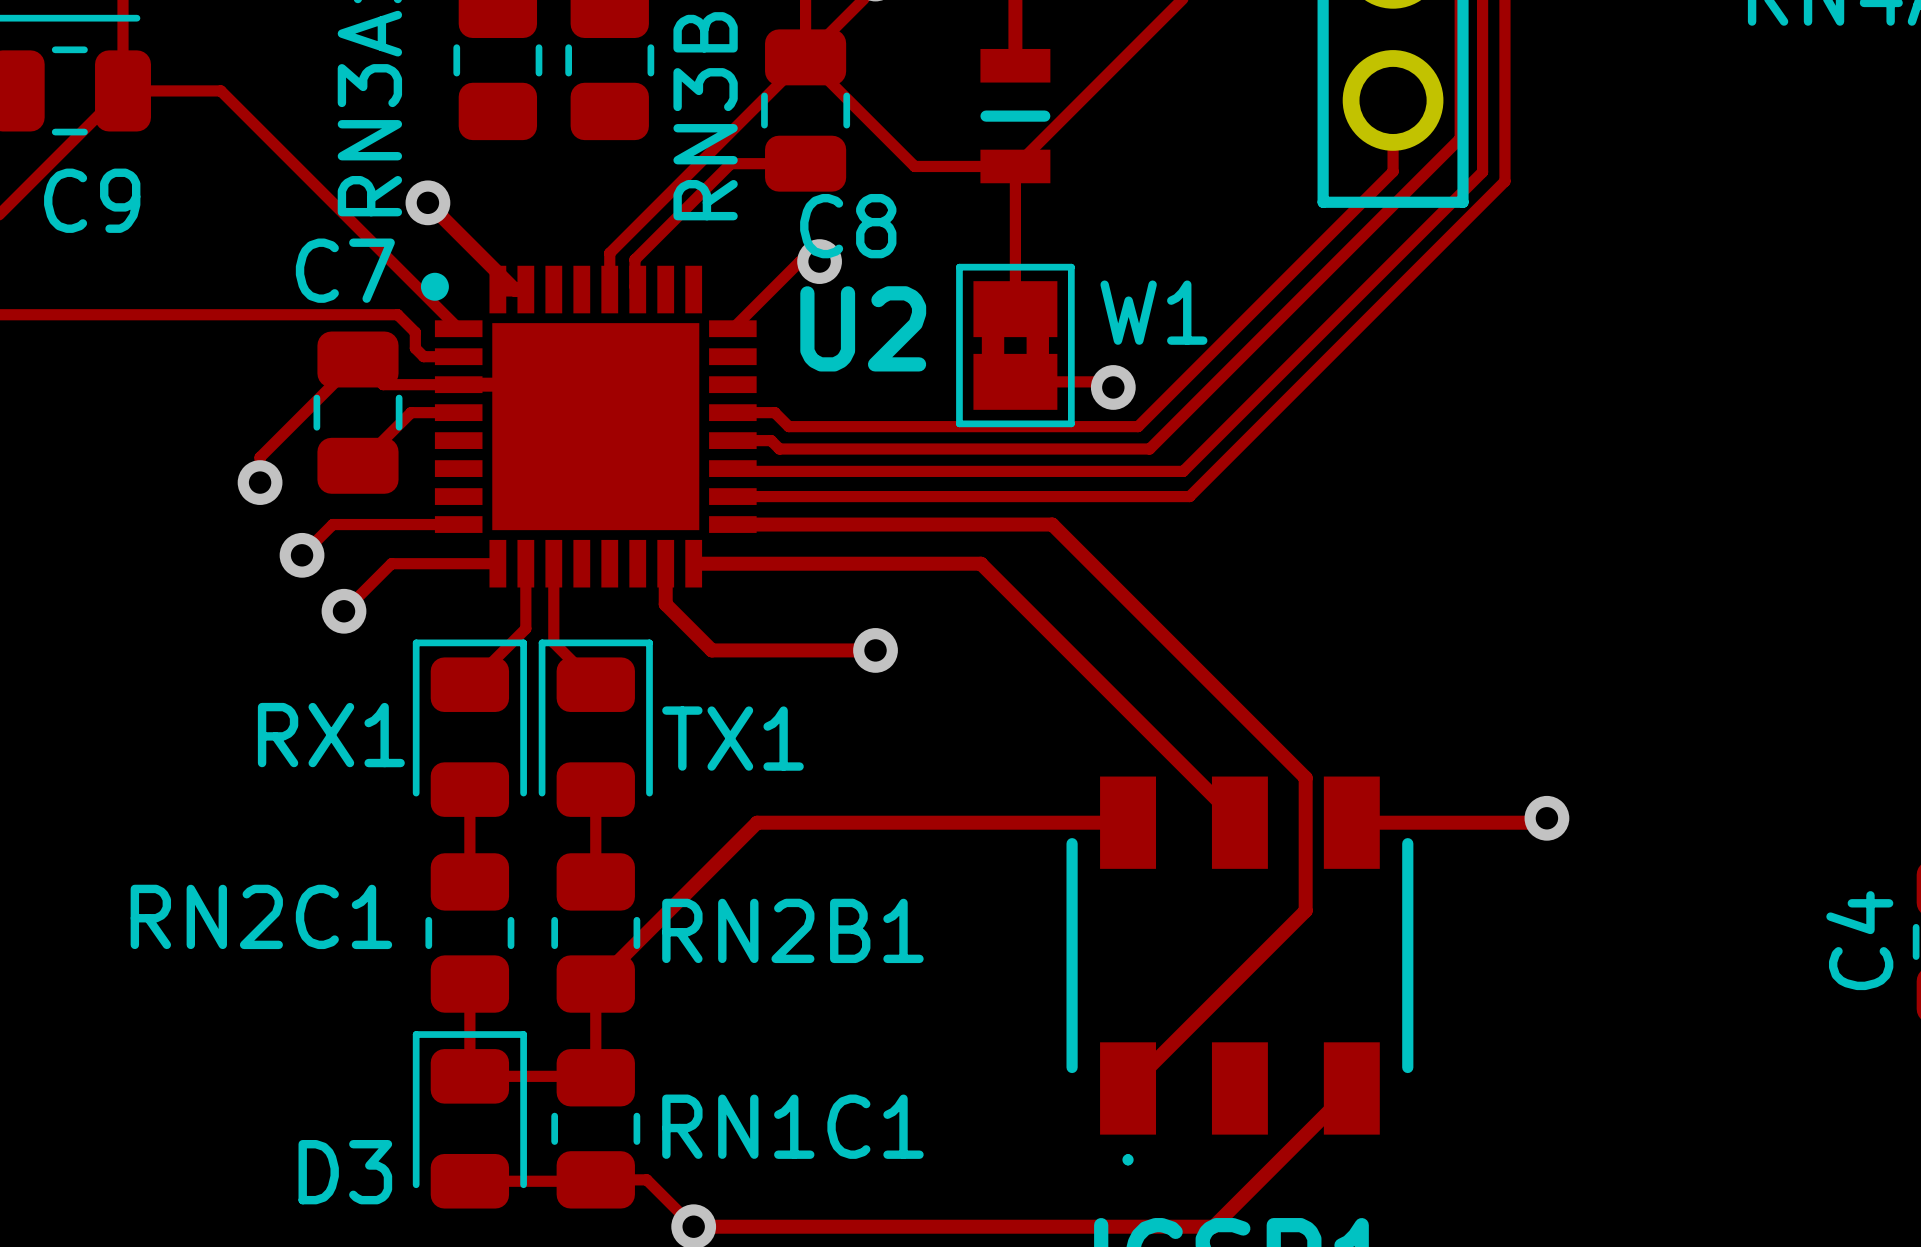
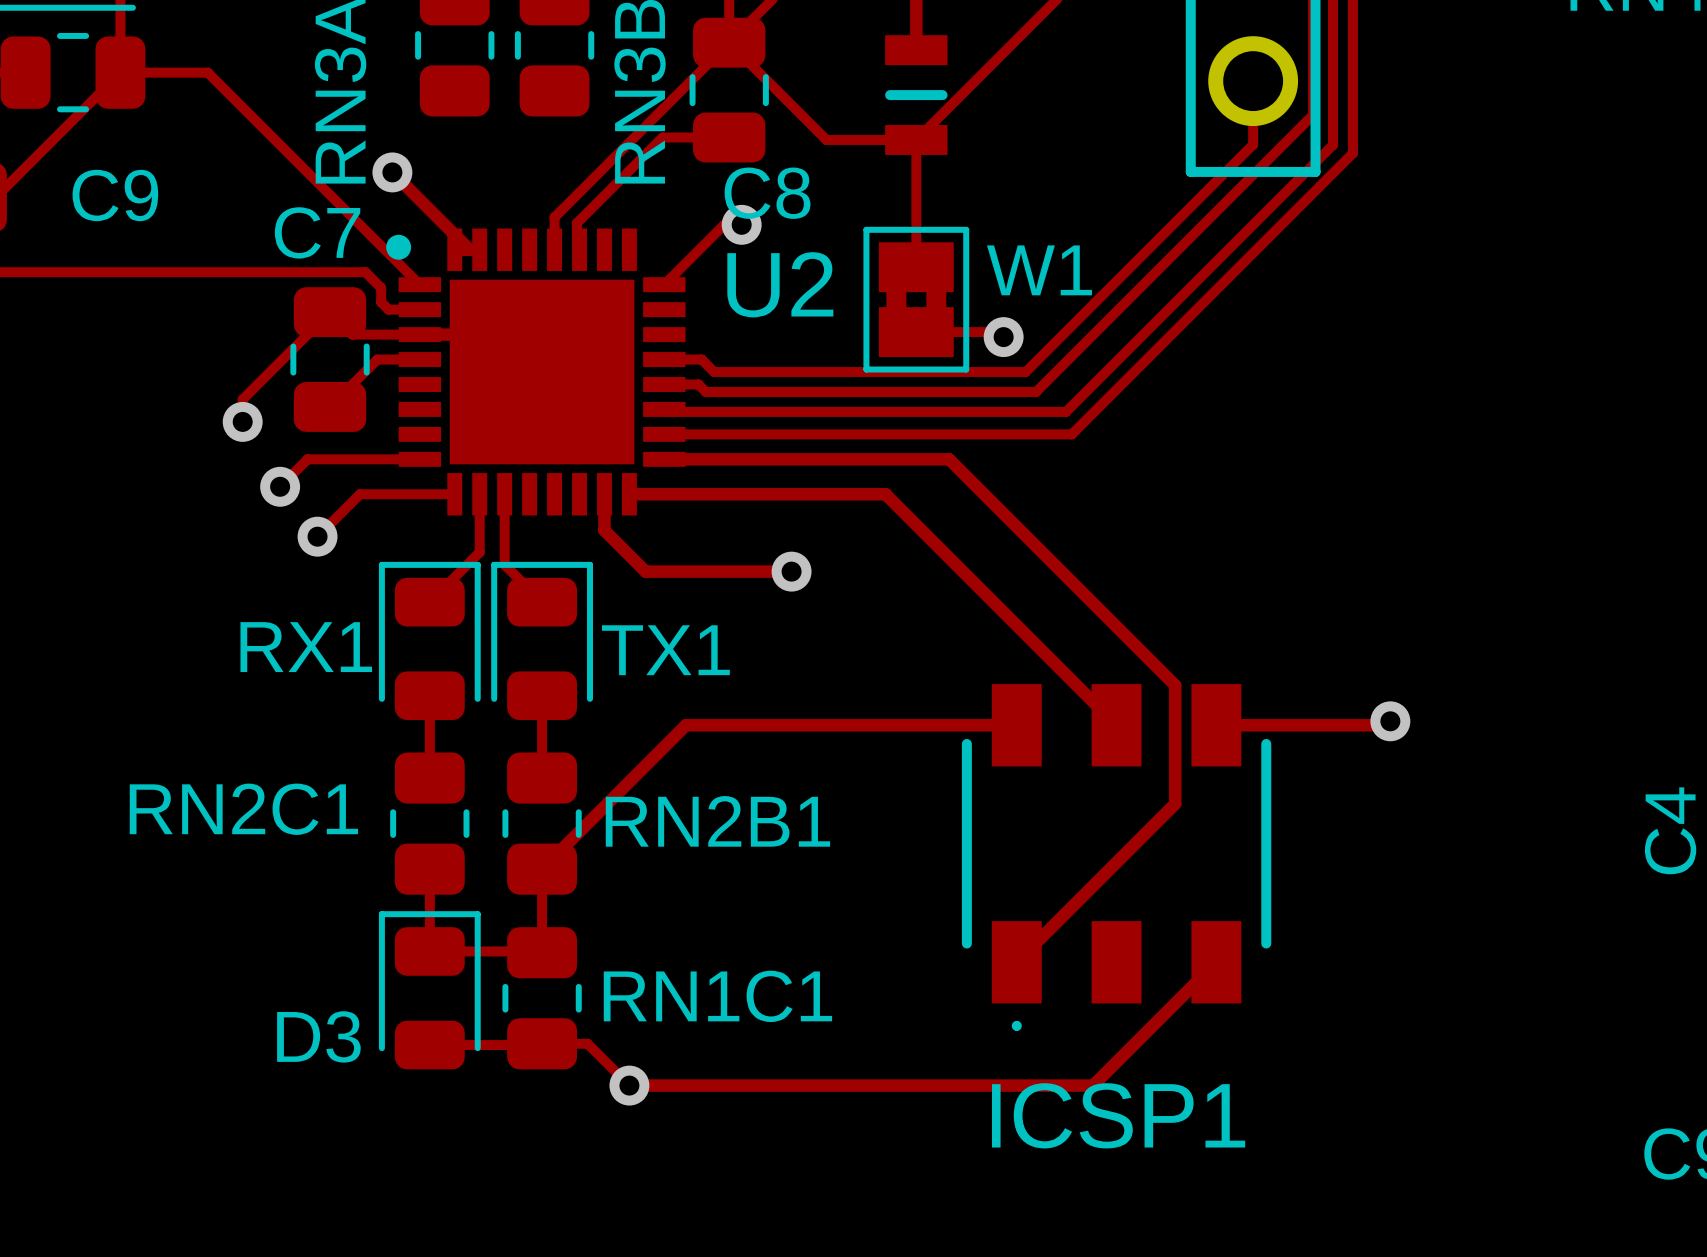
C9 name position: C9 (92, 200) -> C9 (115, 195)

